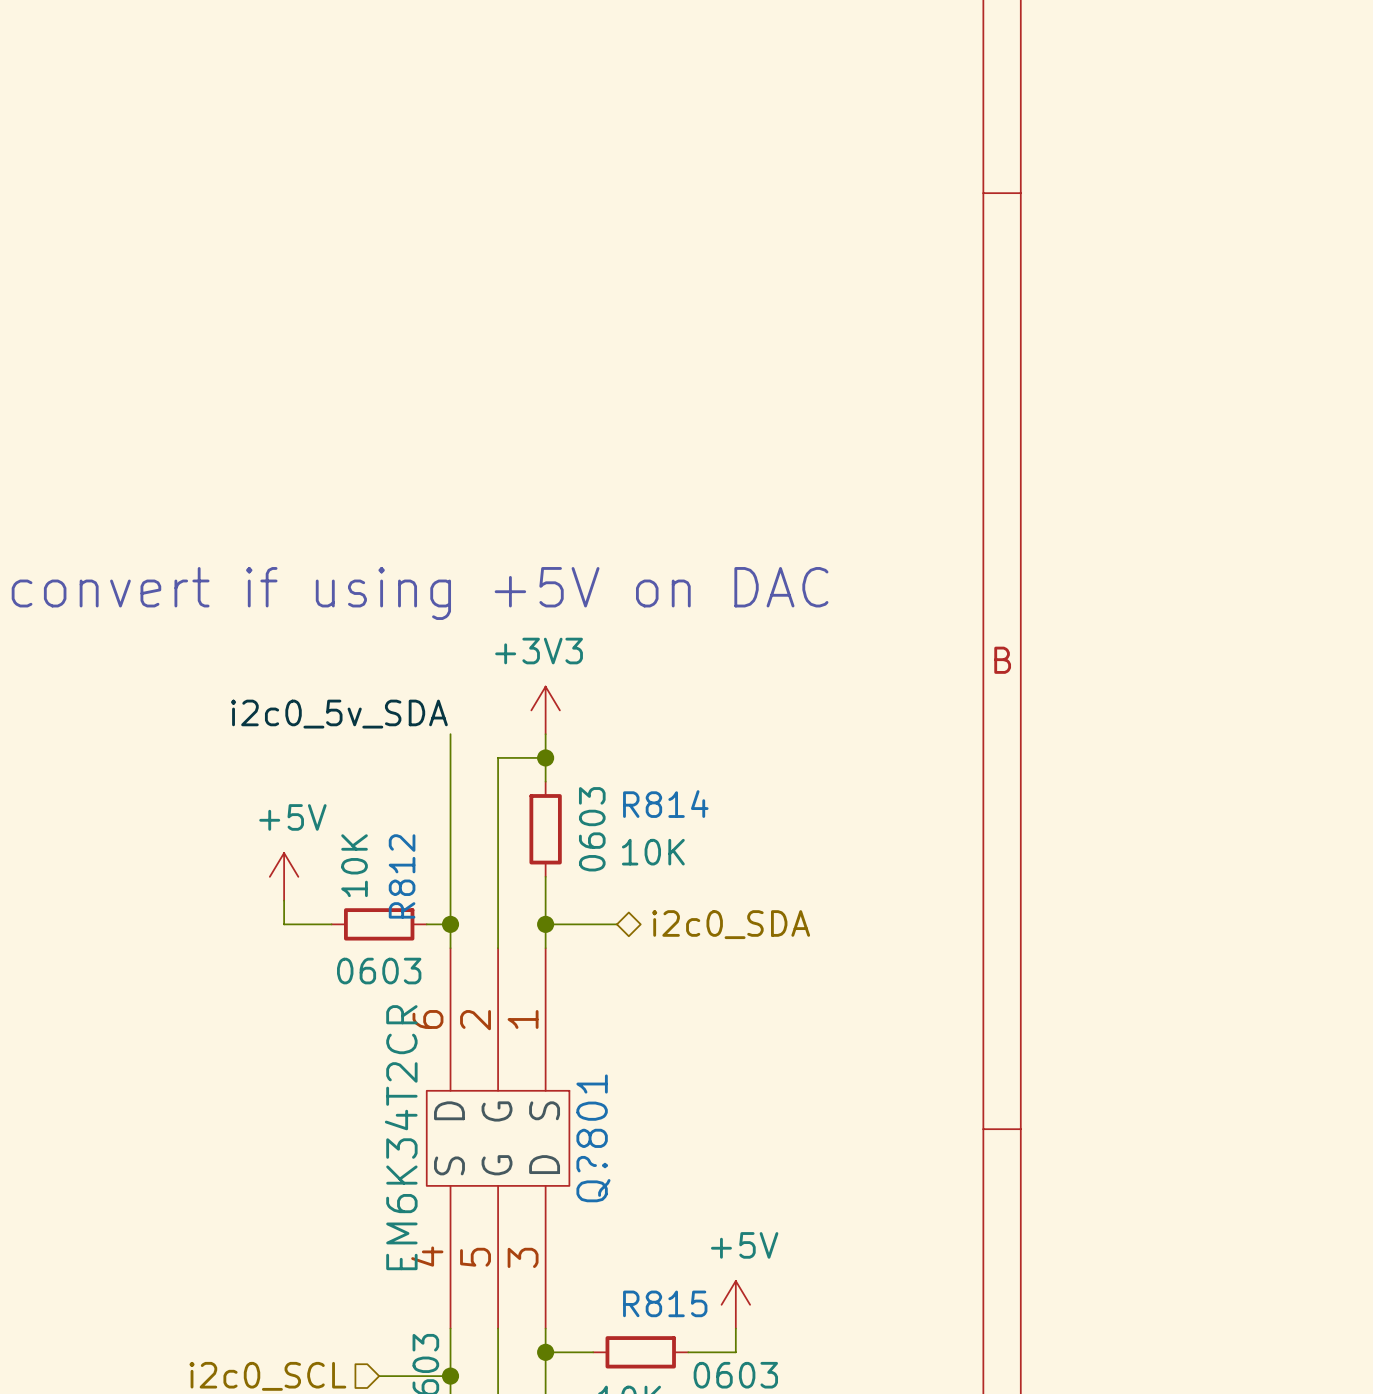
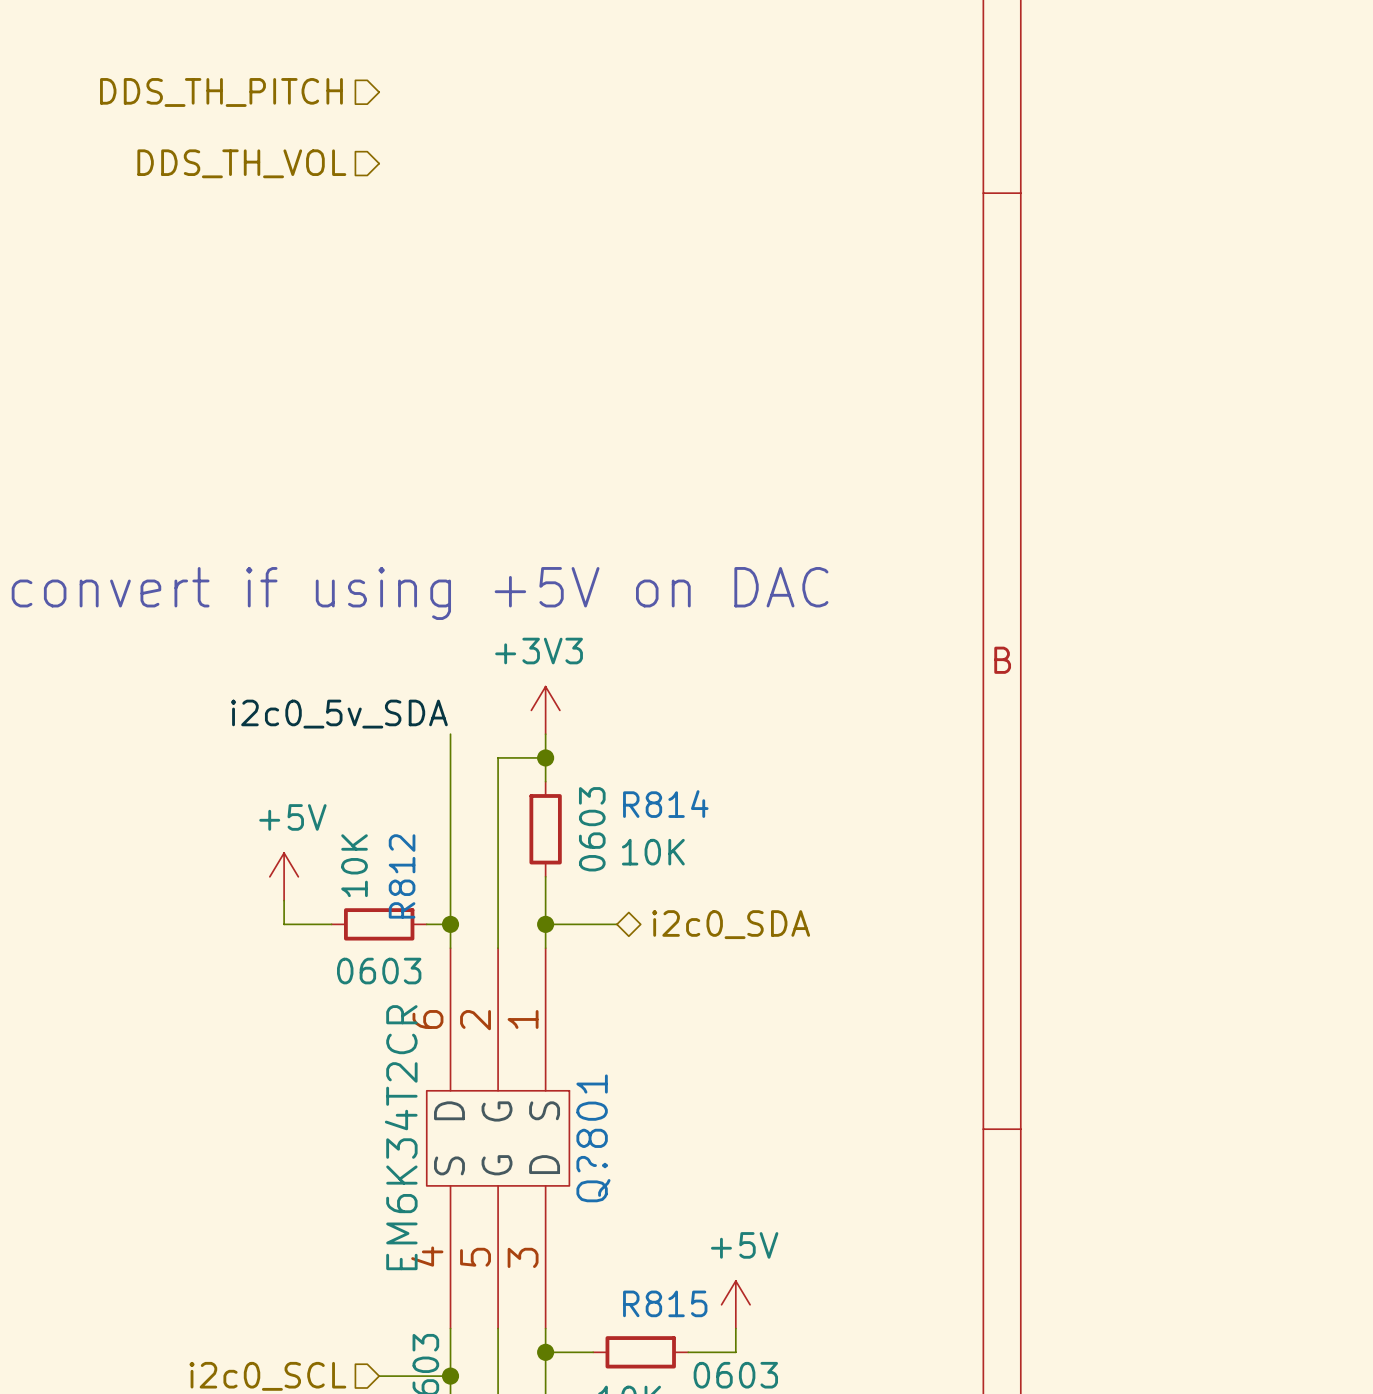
hierarchical label: none -> DDS_TH_PITCH (221, 92)
hierarchical label: none -> DDS_TH_VOL (241, 163)

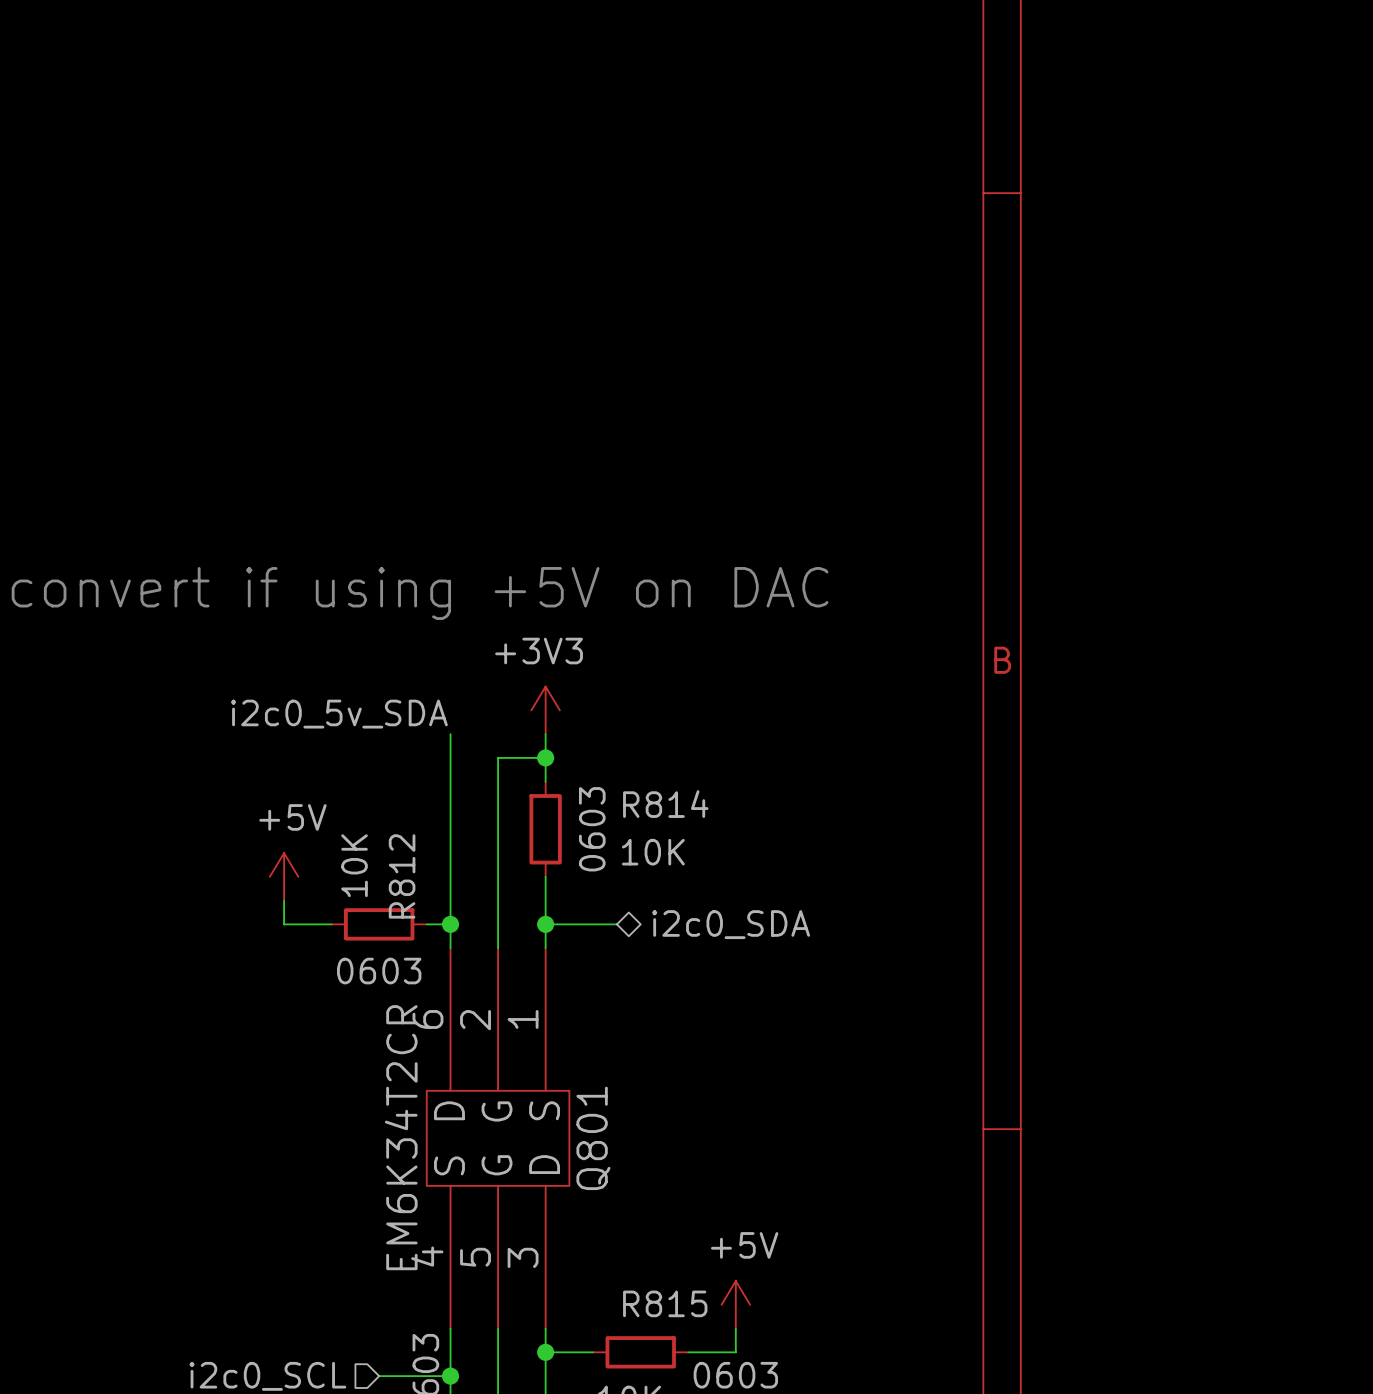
hierarchical label: DDS_TH_PITCH (221, 92) -> none
hierarchical label: DDS_TH_VOL (241, 163) -> none
Q?801 name: Q?801 (593, 1138) -> Q801 (593, 1138)

